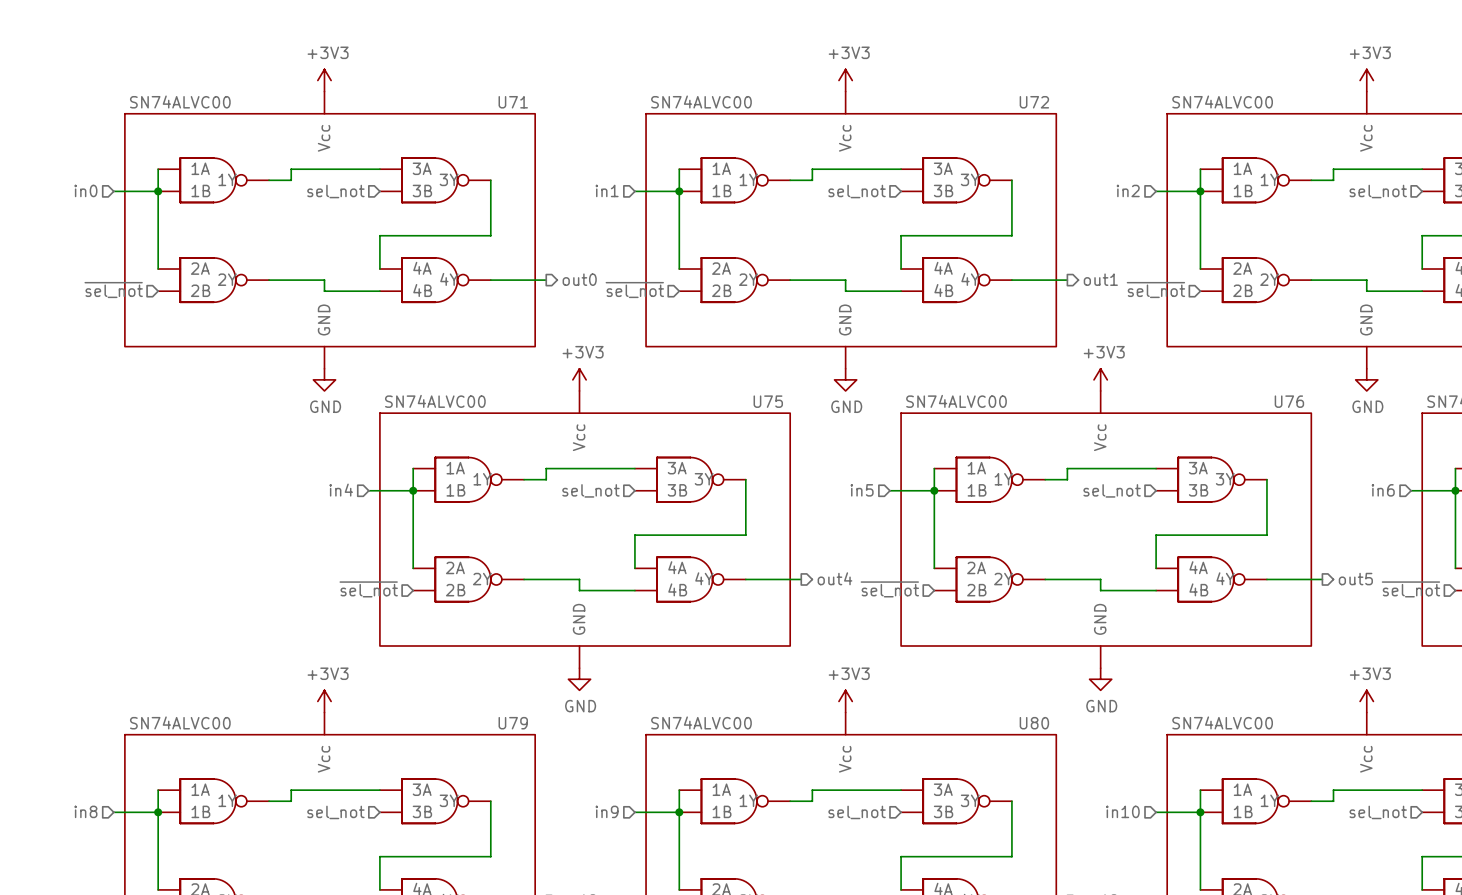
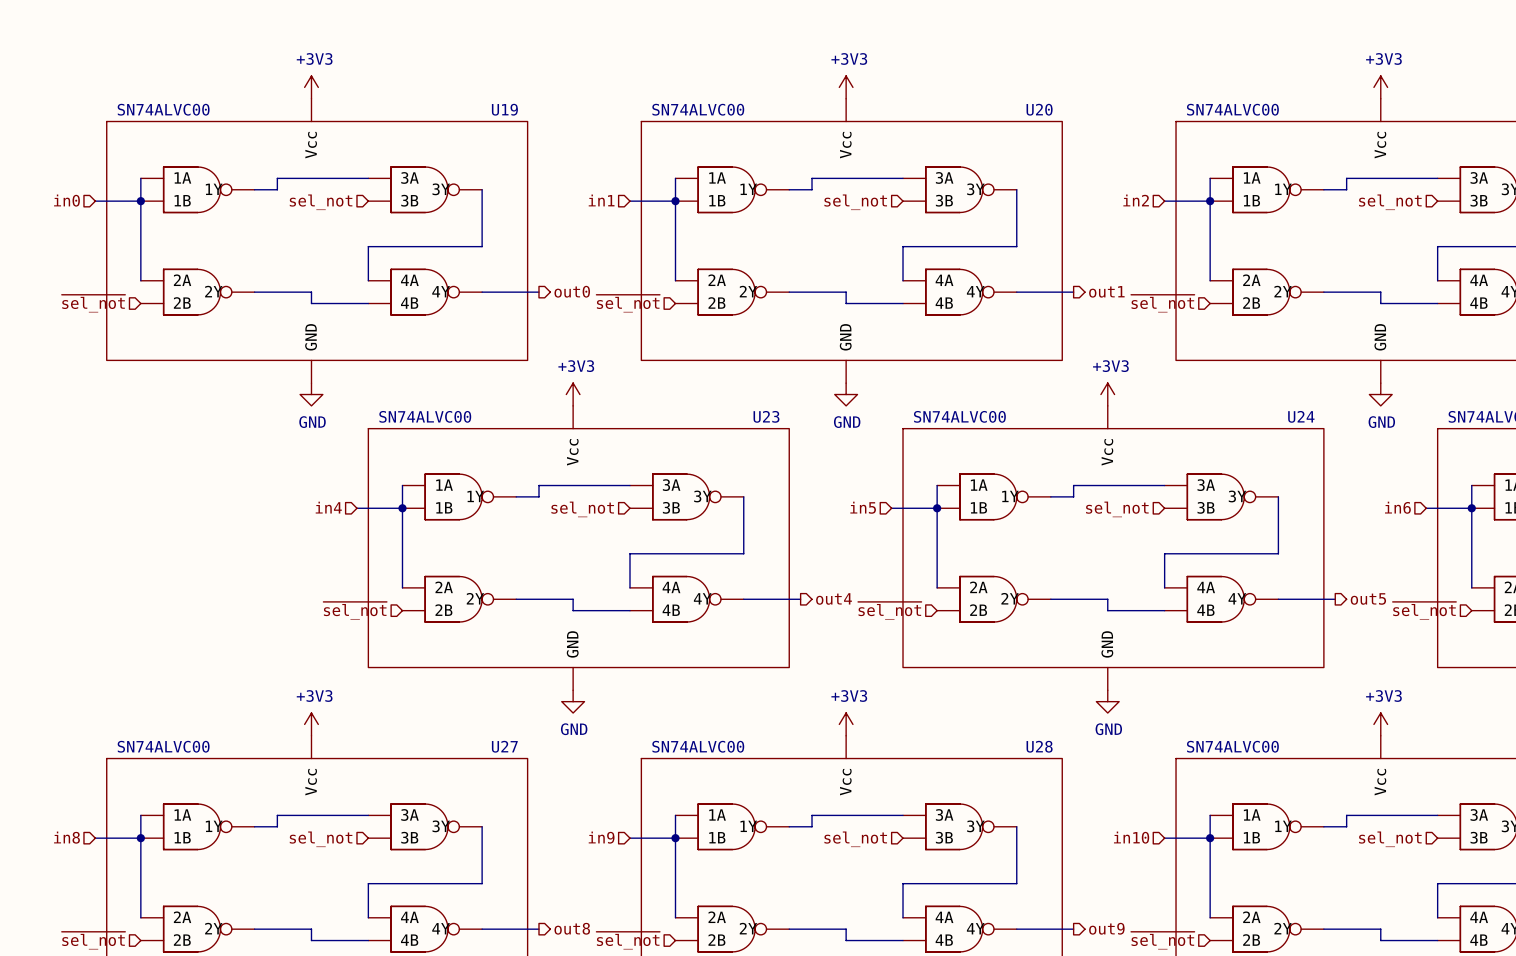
U71 name: U71 (513, 102) -> U19 (504, 109)
U72 name: U72 (1034, 102) -> U20 (1039, 109)
U75 name: U75 (768, 401) -> U23 (766, 416)
U76 name: U76 (1289, 401) -> U24 (1301, 416)
U79 name: U79 (513, 723) -> U27 (504, 746)
U80 name: U80 (1034, 723) -> U28 (1039, 746)

